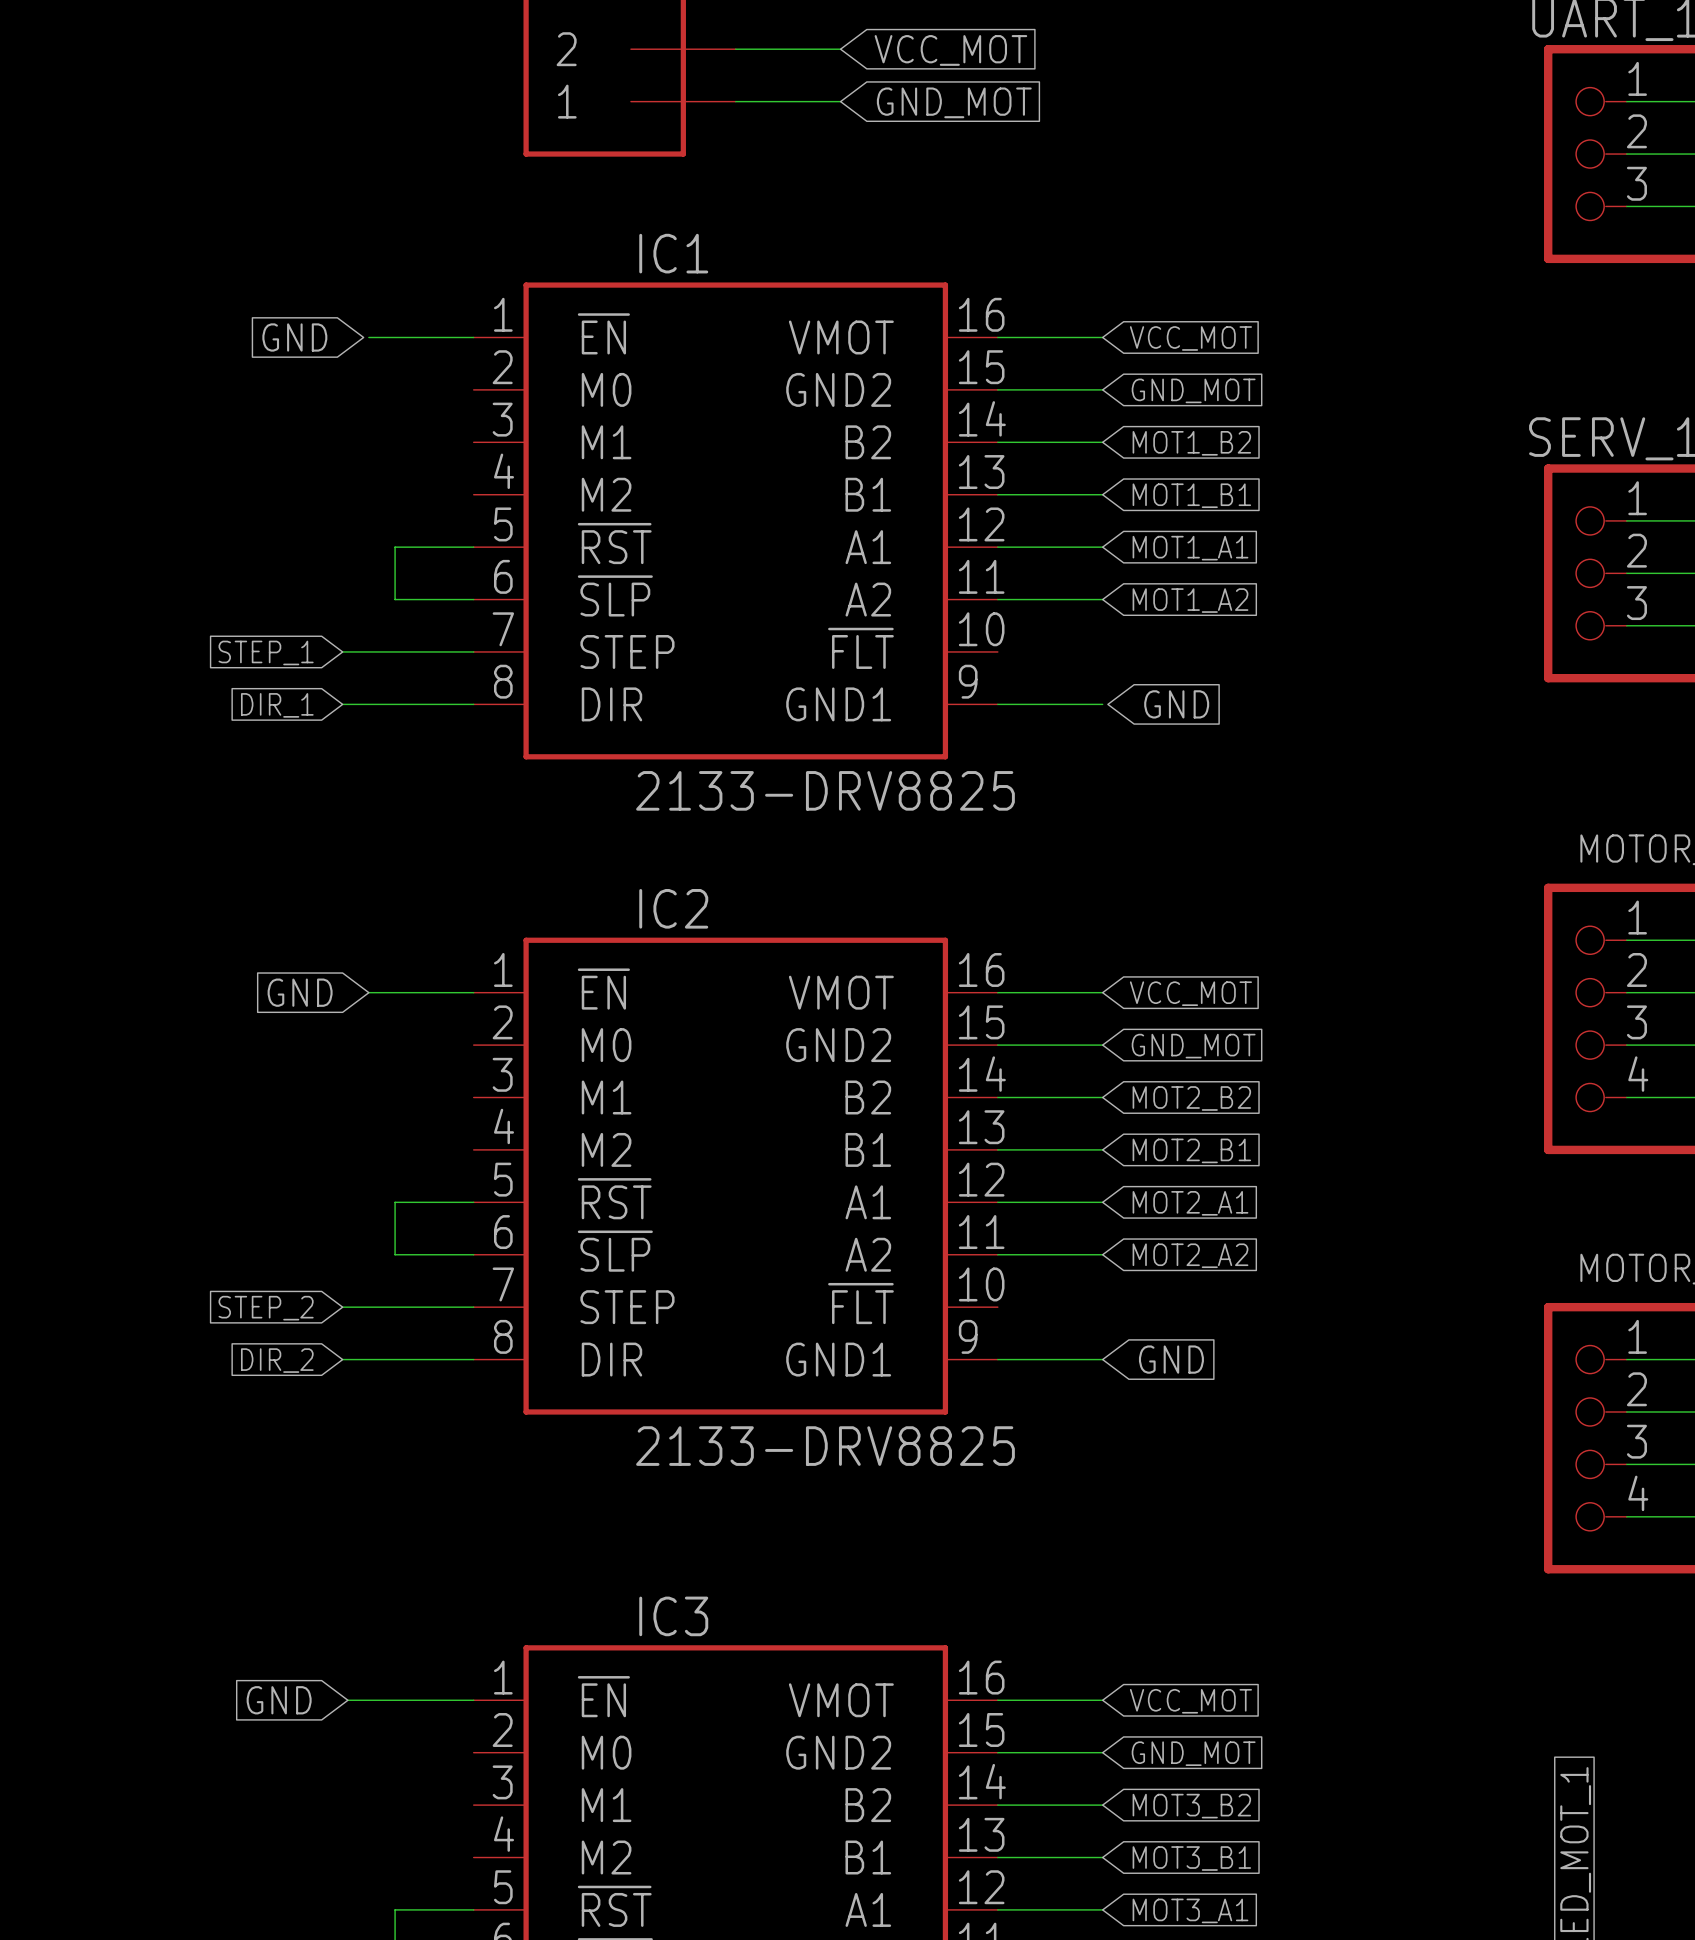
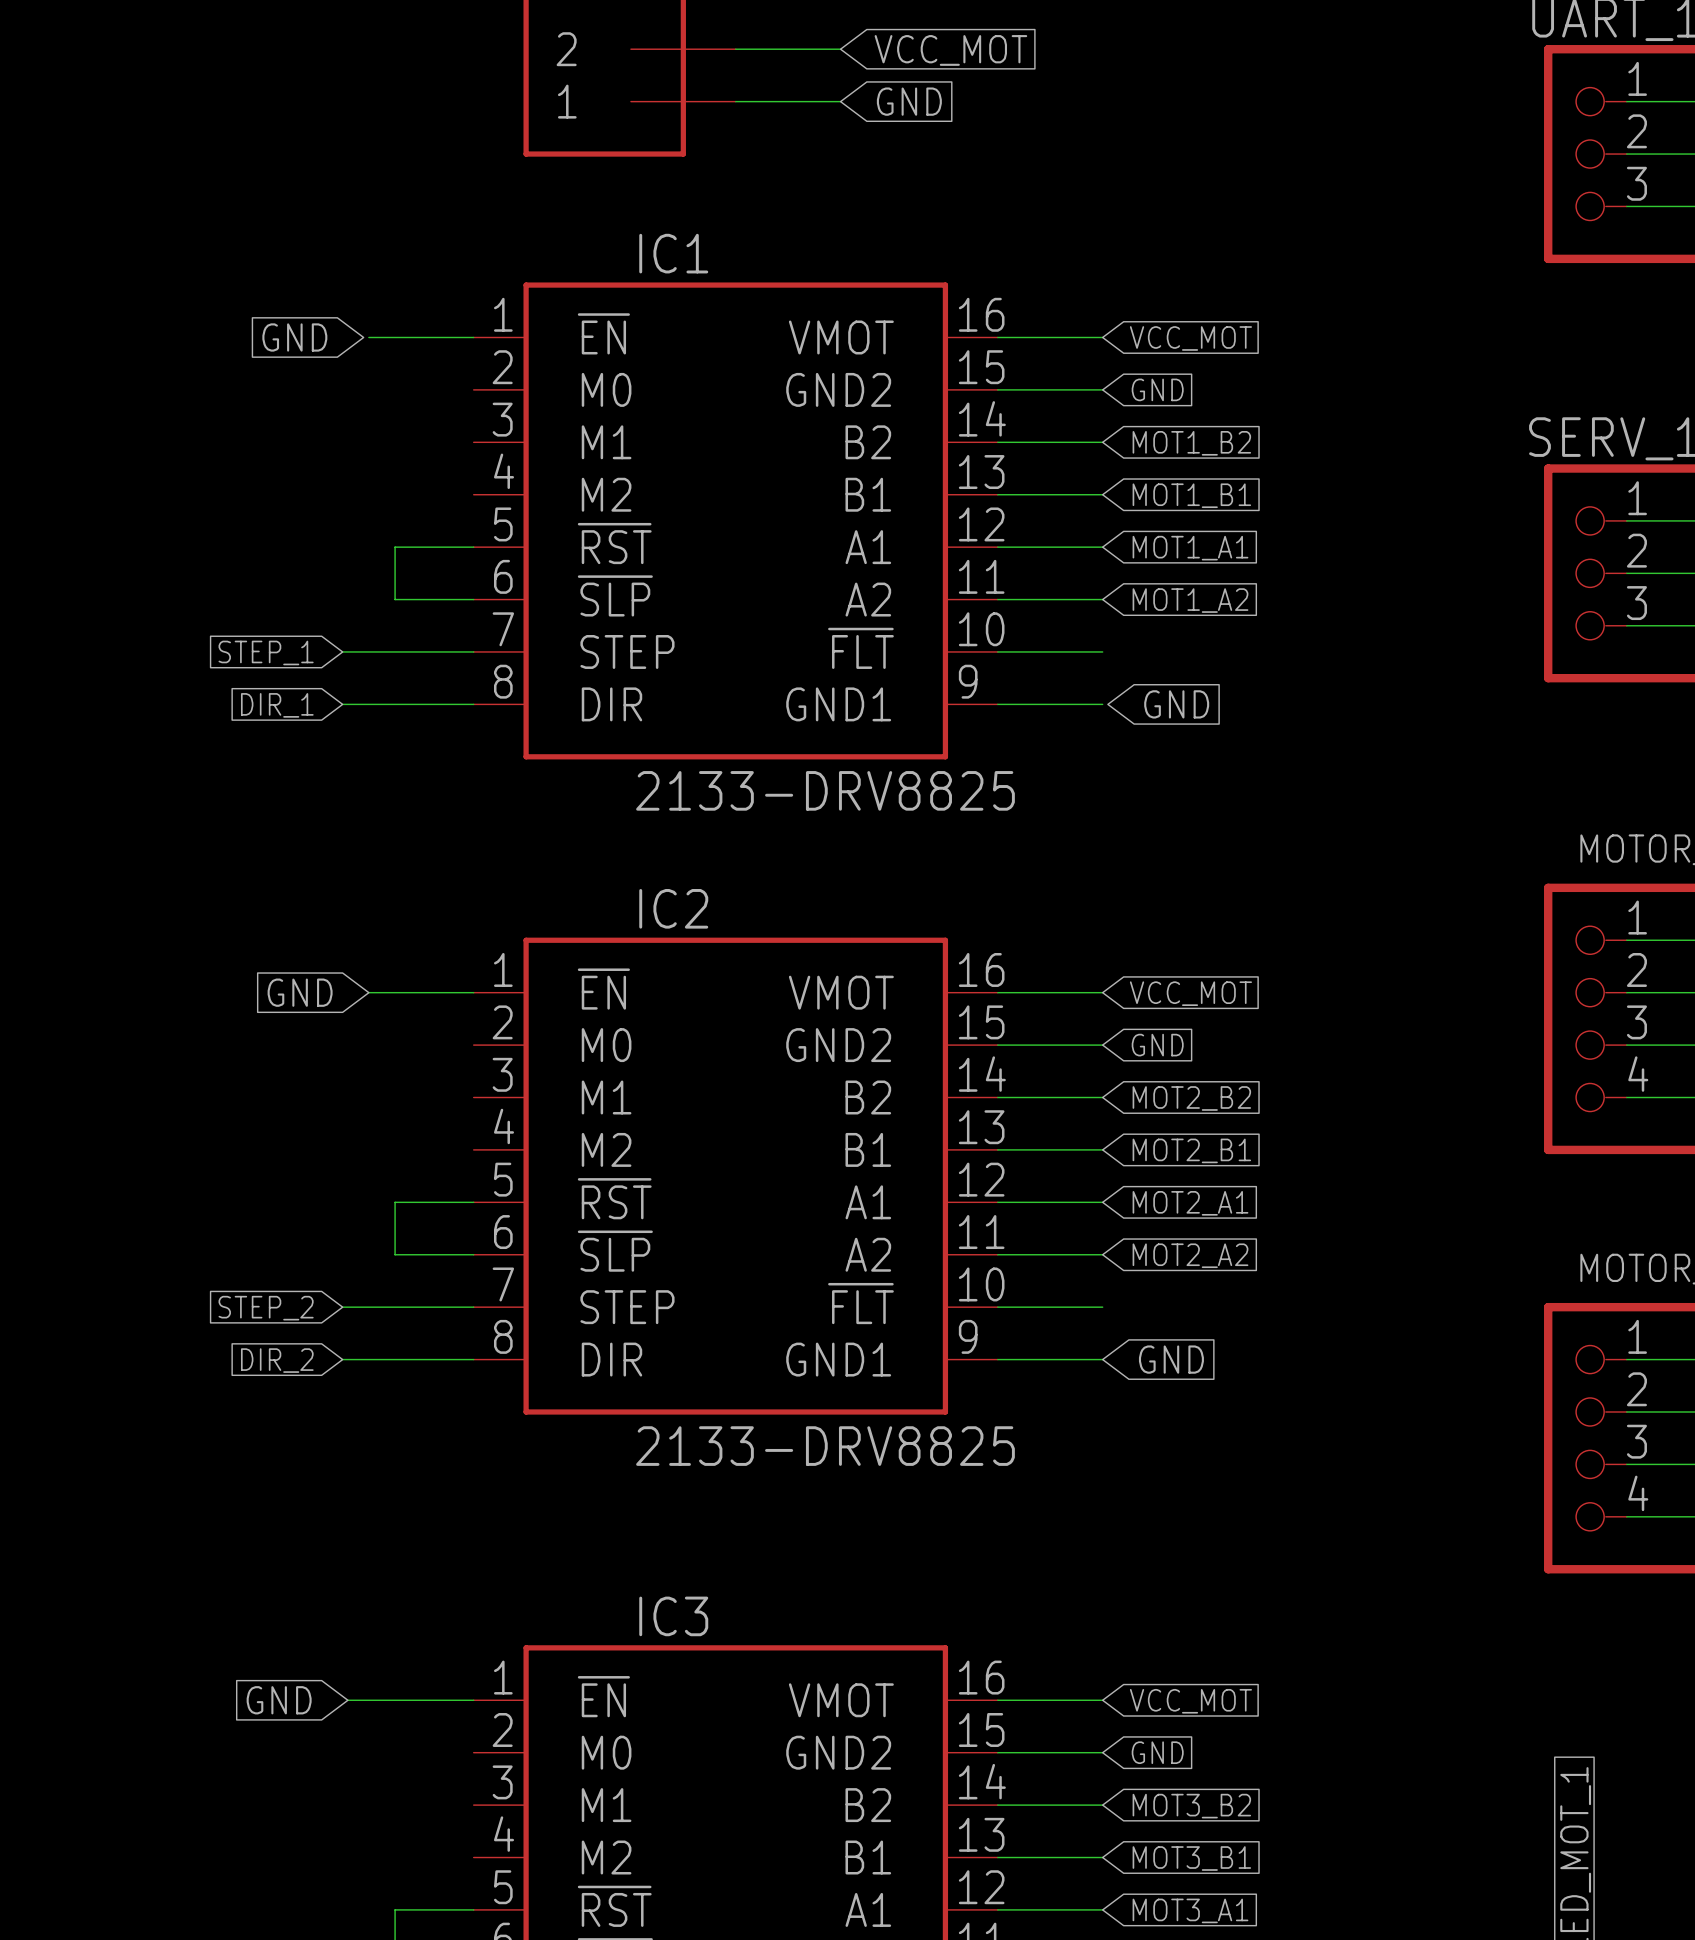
global label: GND_MOT (954, 102) -> GND (909, 101)
global label: GND_MOT (1193, 390) -> GND (1157, 389)
wire: none -> (997, 651) (1102, 651)
global label: GND_MOT (1193, 1046) -> GND (1157, 1045)
wire: none -> (997, 1307) (1102, 1307)
global label: GND_MOT (1193, 1753) -> GND (1157, 1752)

